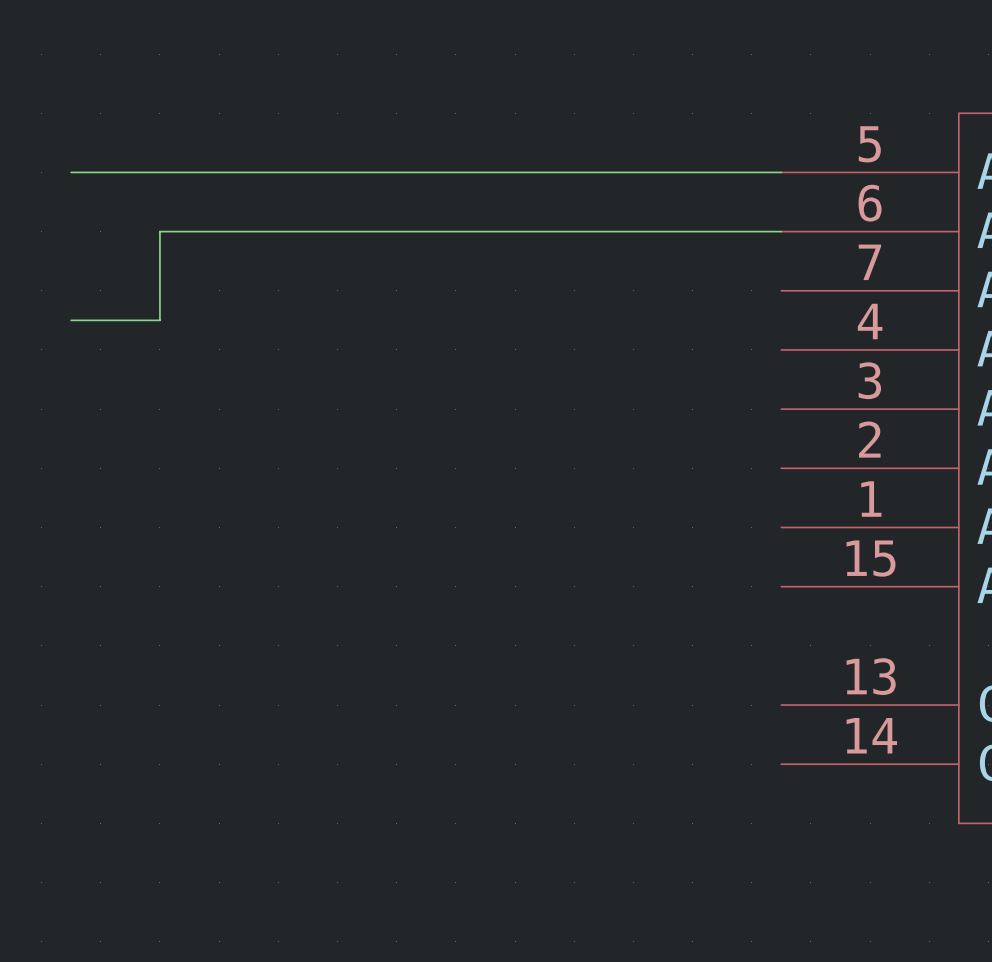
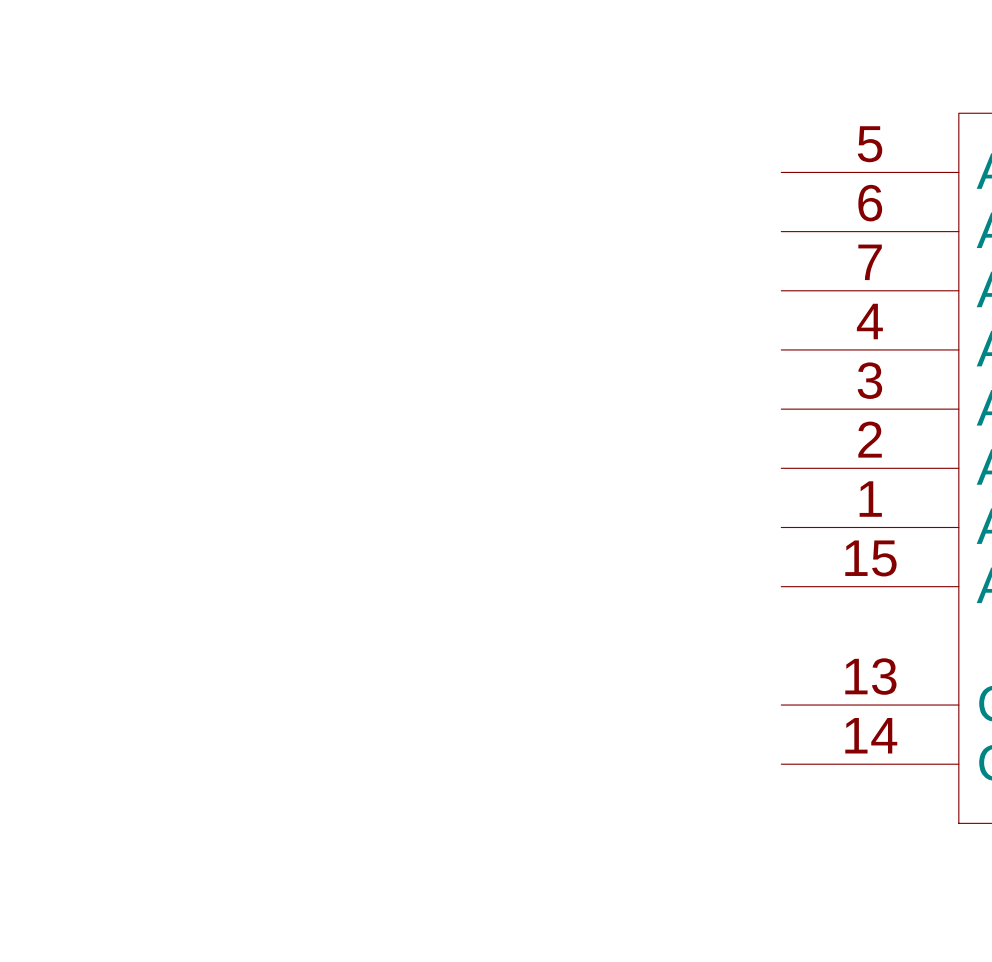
wire: (71, 172) (781, 172) -> none
wire: (781, 231) (159, 231) (159, 320) (71, 320) -> none

